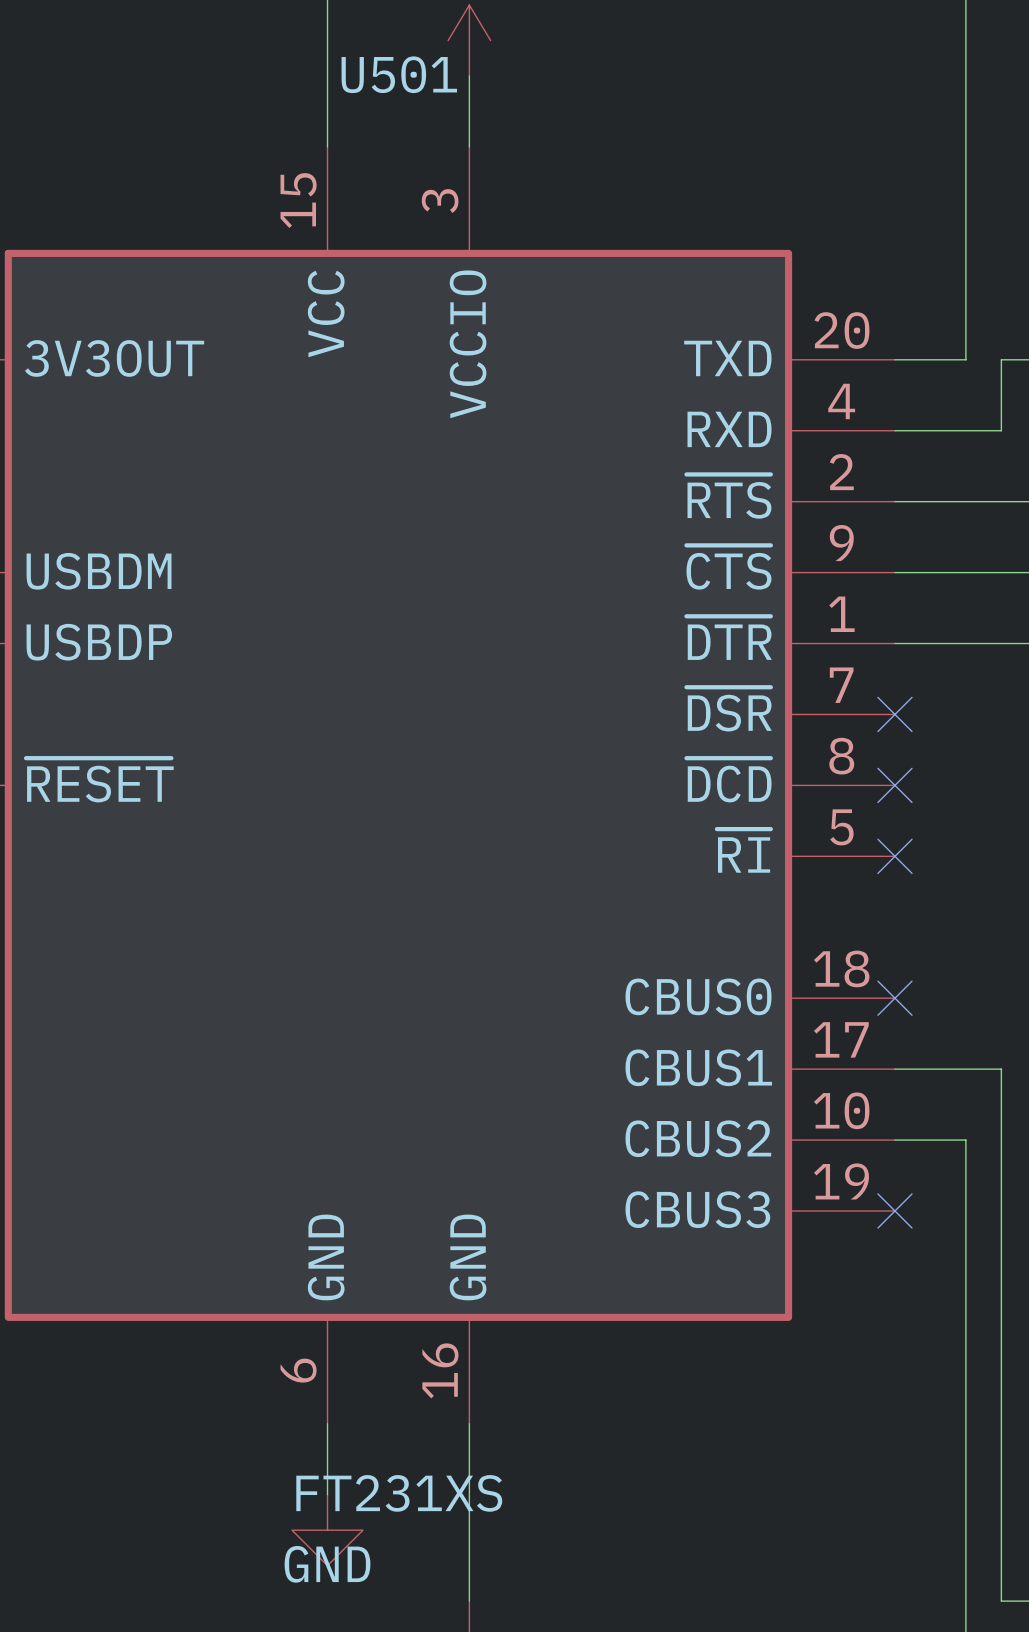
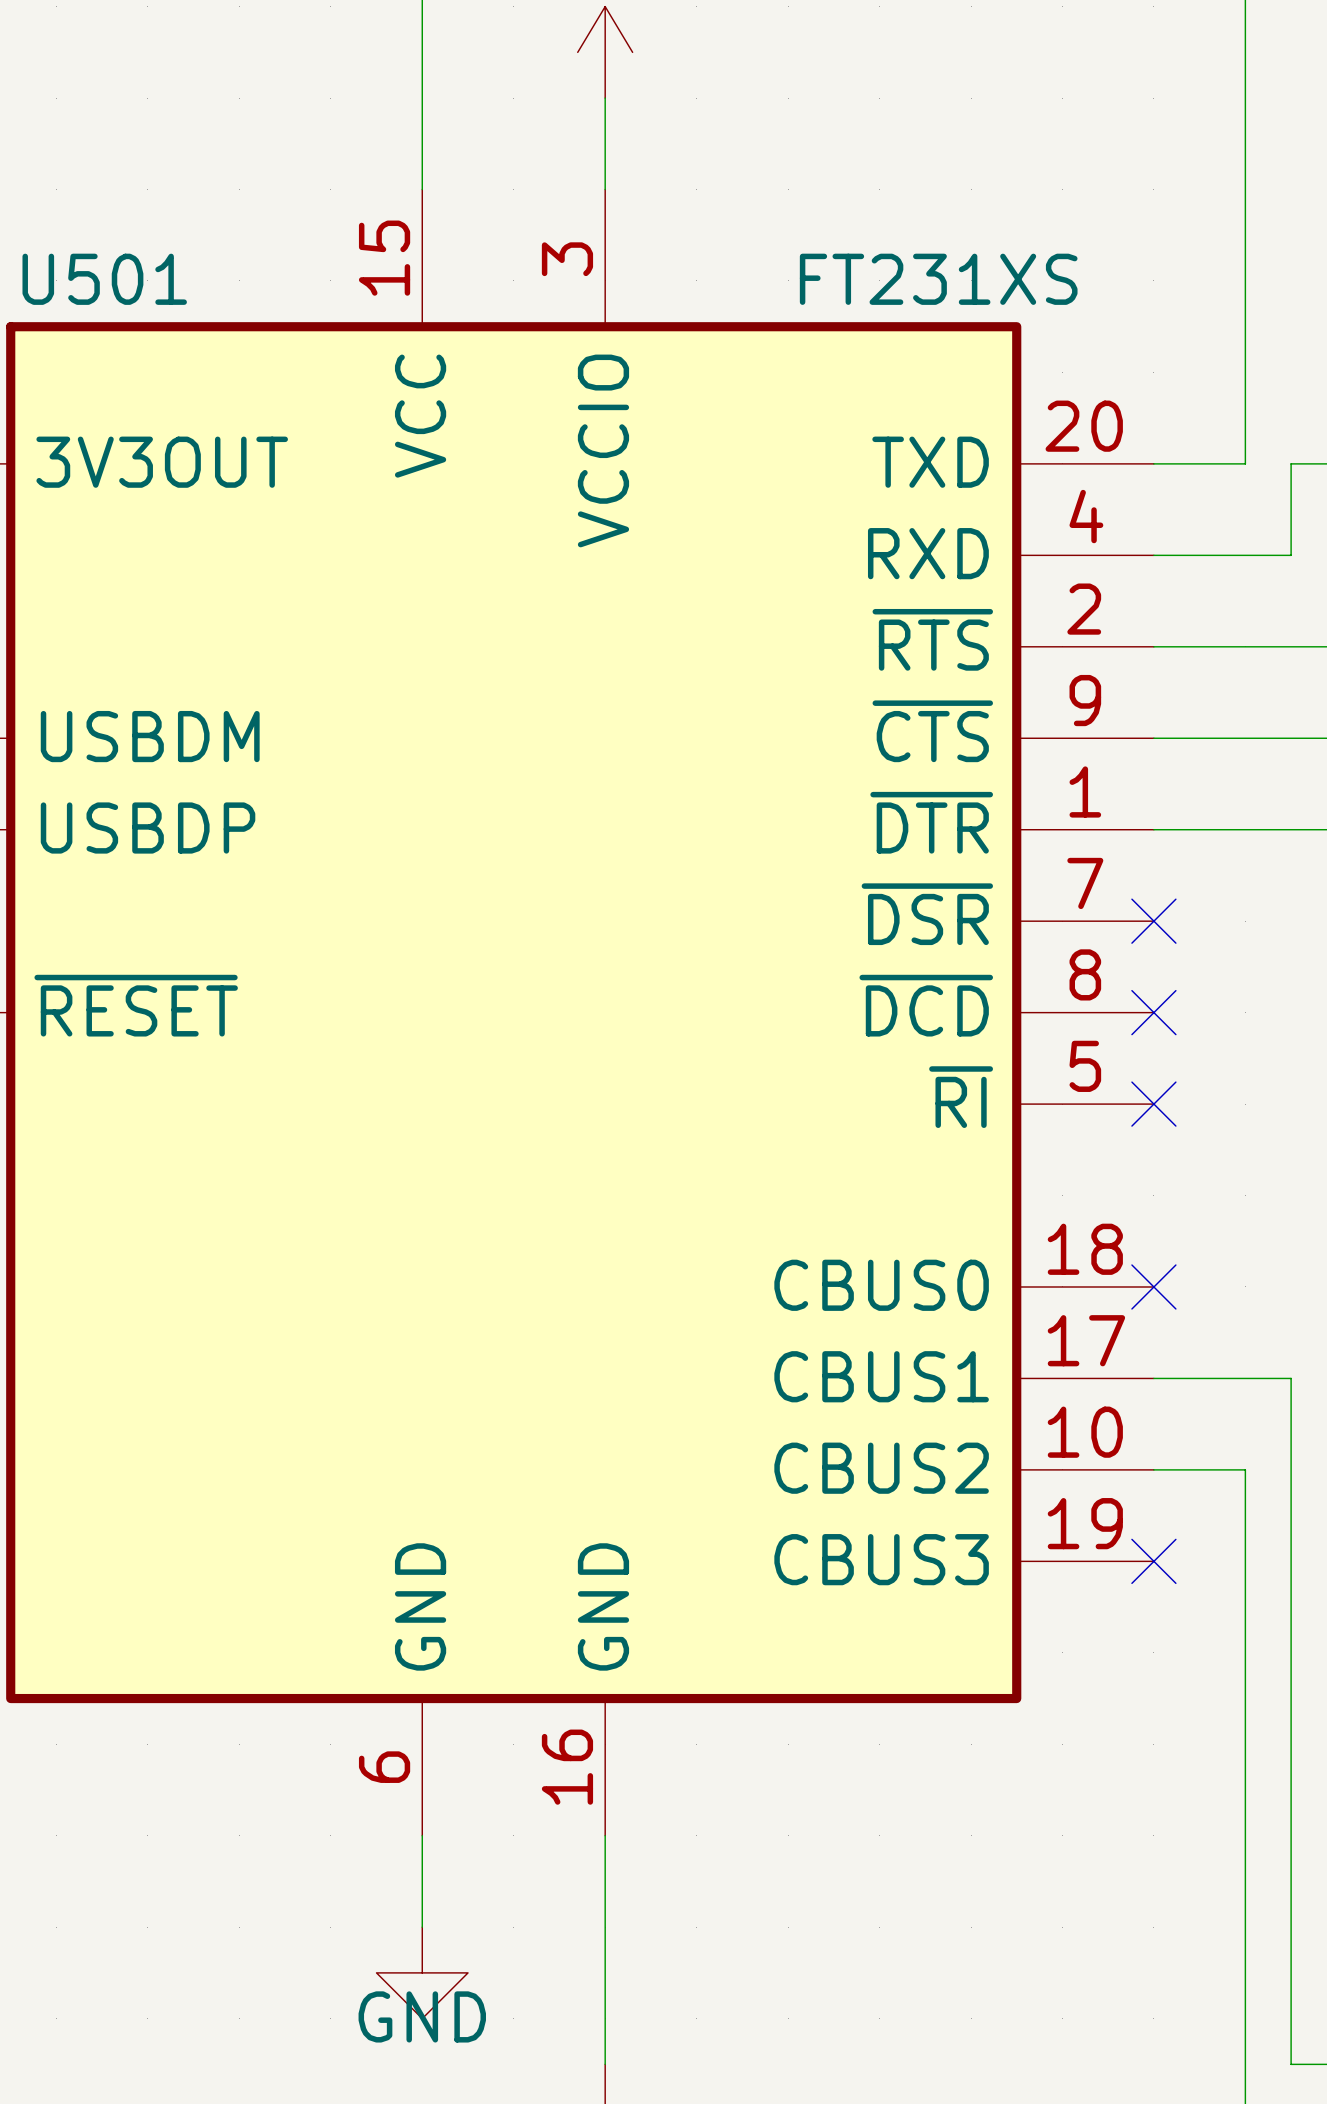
U501 name position: U501 (399, 74) -> U501 (104, 279)
U501 value position: FT231XS (399, 1493) -> FT231XS (938, 279)

